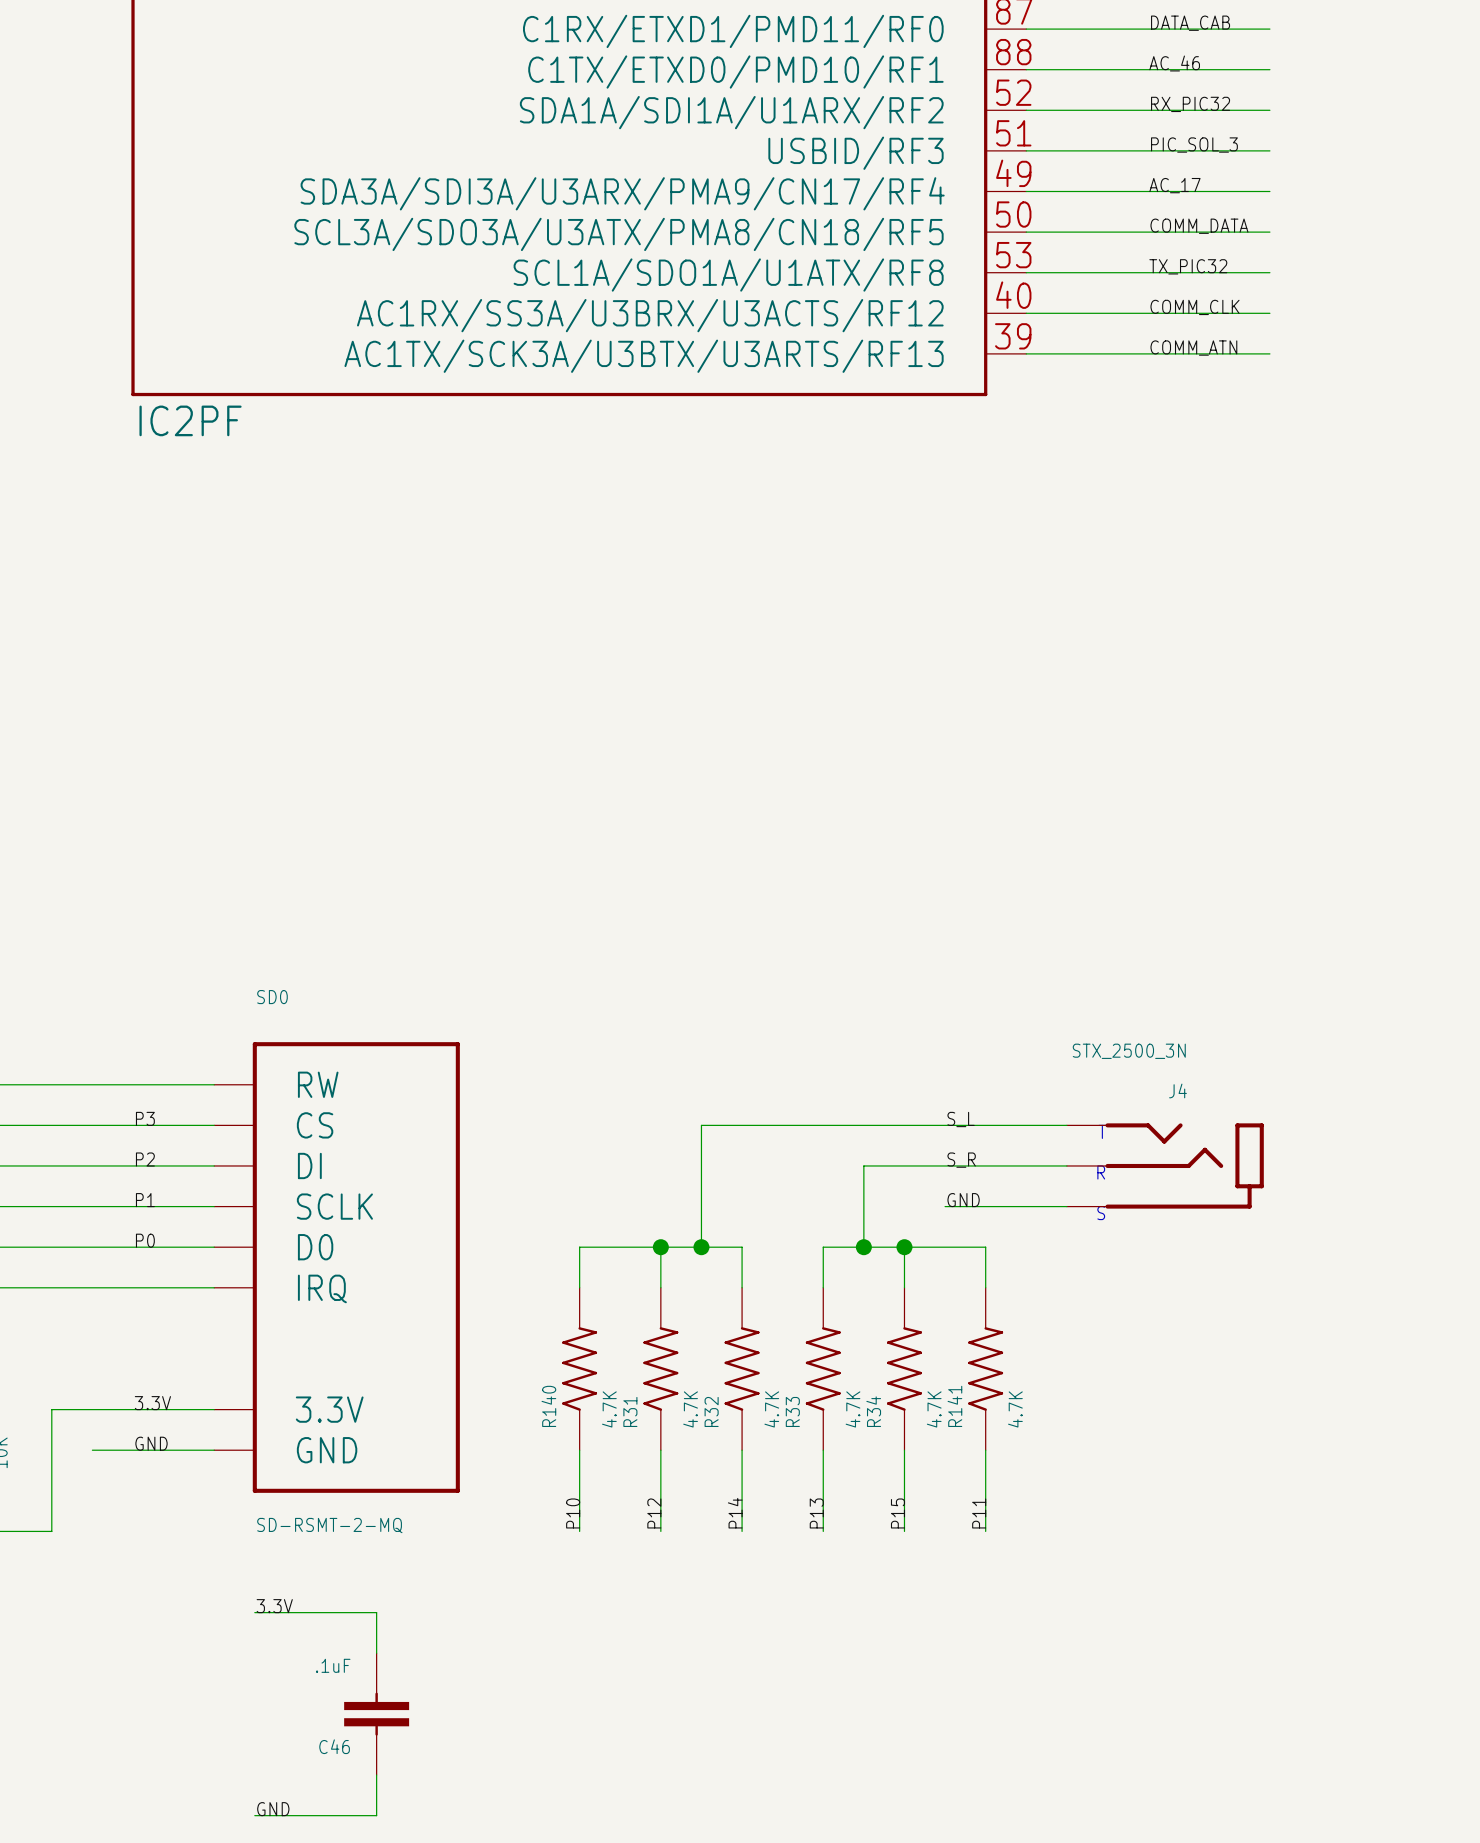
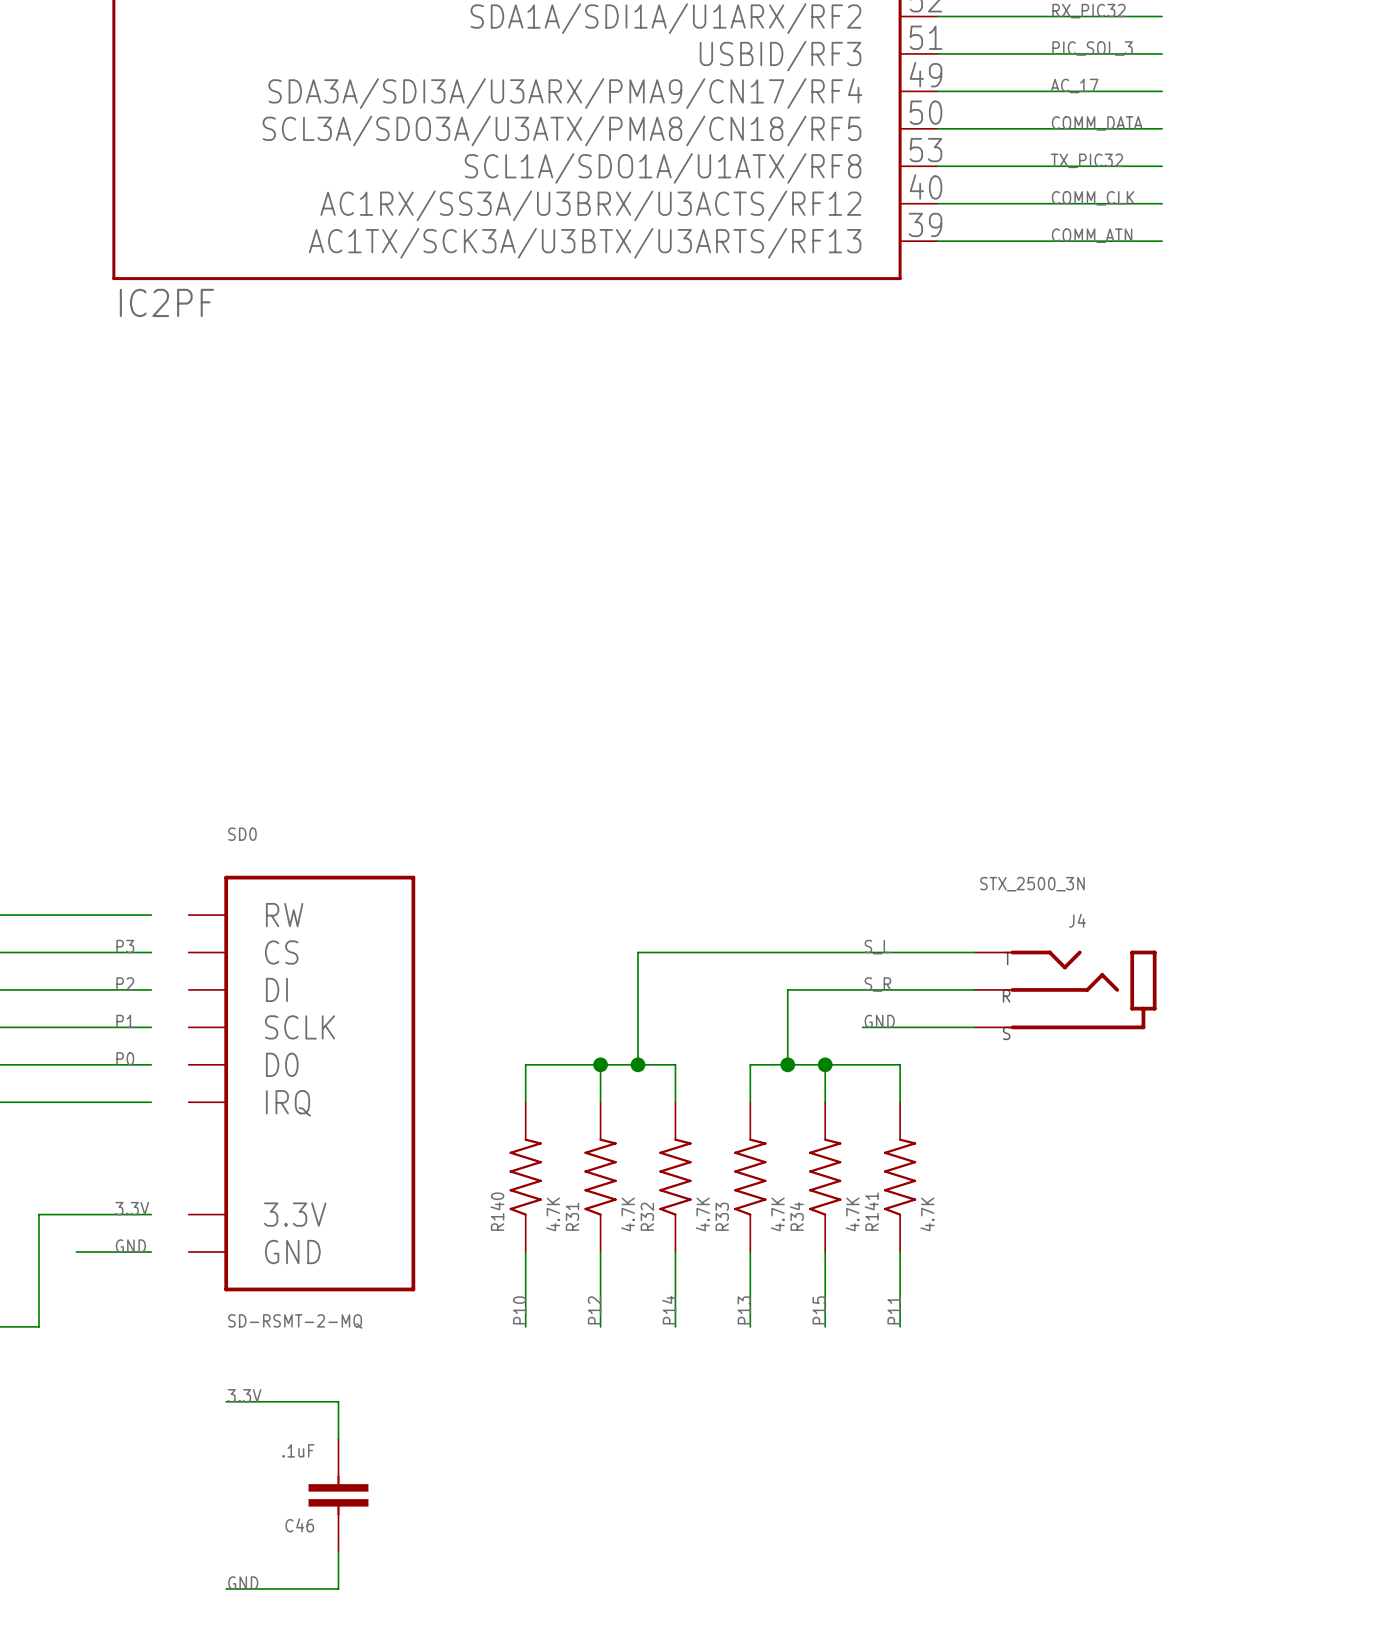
wire: (173, 1084) (214, 1084) -> none
wire: (173, 1125) (214, 1125) -> none
wire: (173, 1165) (214, 1165) -> none
wire: (173, 1206) (214, 1206) -> none
wire: (173, 1247) (214, 1247) -> none
wire: (173, 1287) (214, 1287) -> none
wire: (173, 1409) (214, 1409) -> none
wire: (173, 1450) (214, 1450) -> none

